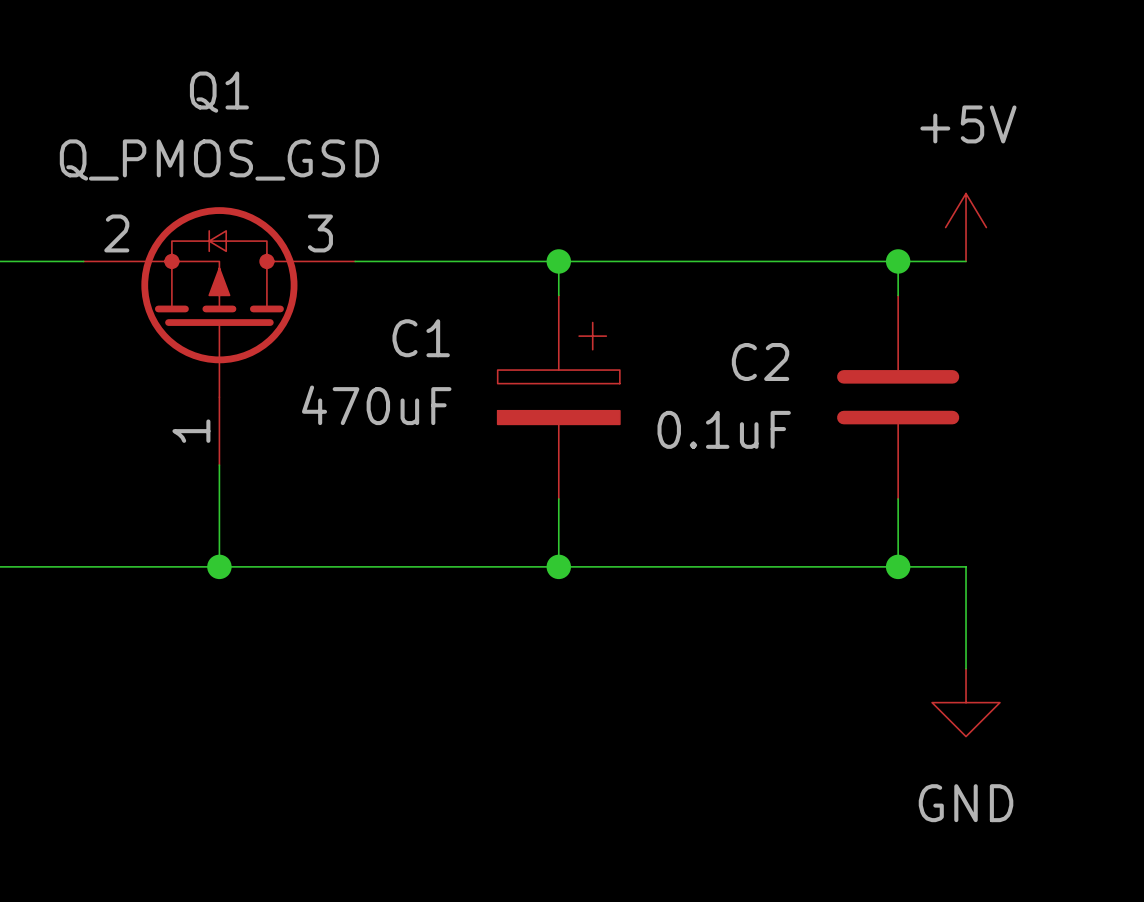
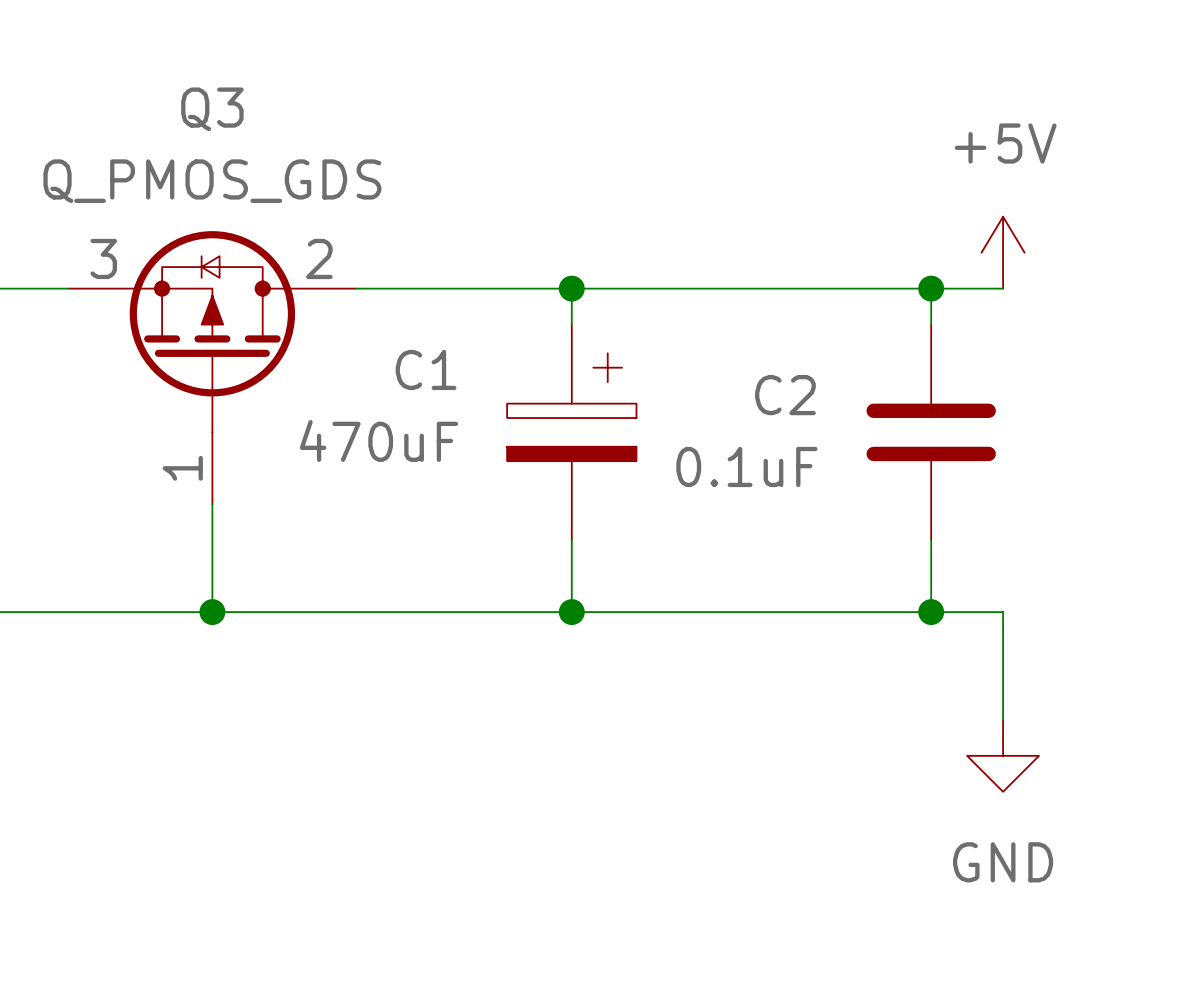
Q1 name: Q1 (219, 92) -> Q3 (212, 109)
Q1 value: Q_PMOS_GSD (219, 159) -> Q_PMOS_GDS (212, 181)
Q1 pin number: 2 (116, 233) -> 3 (103, 258)
Q1 pin number: 3 (320, 233) -> 2 (319, 258)

